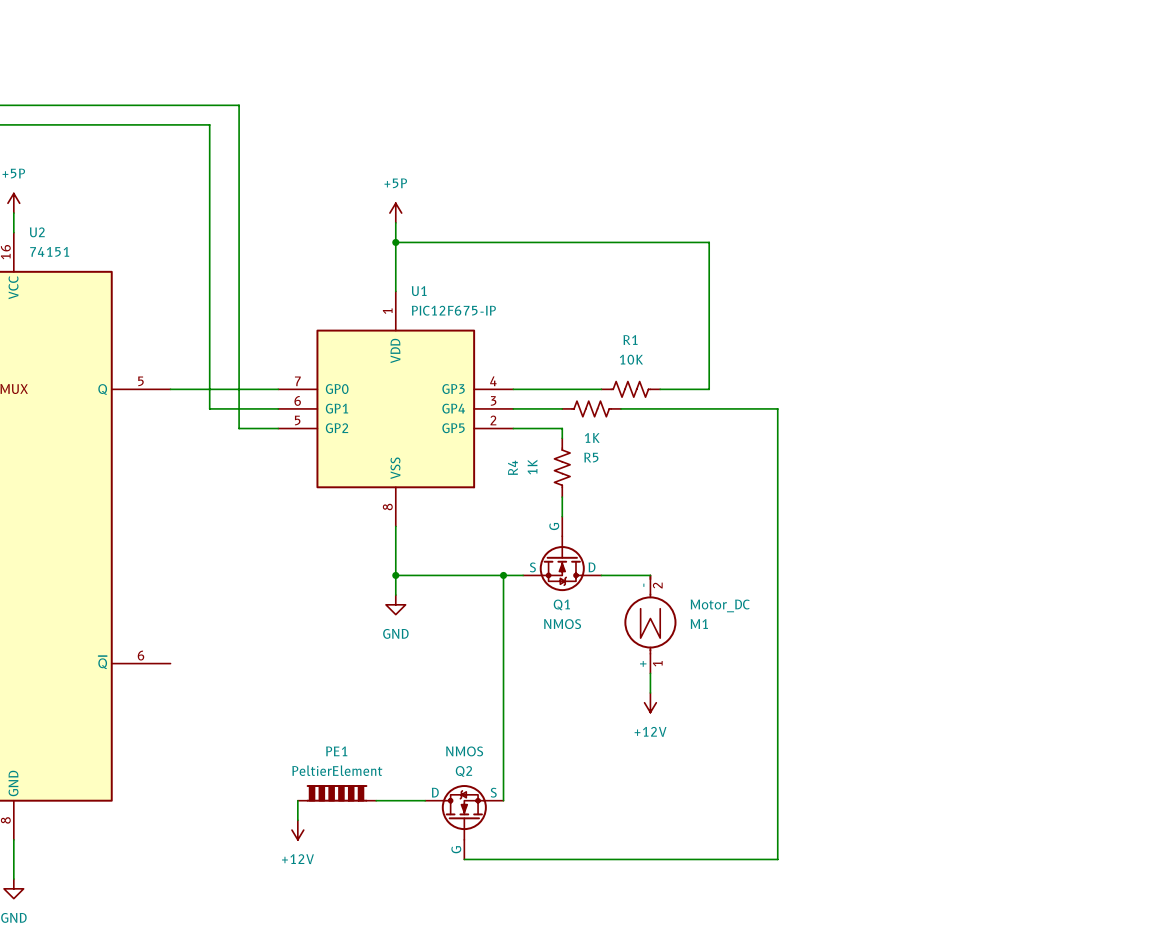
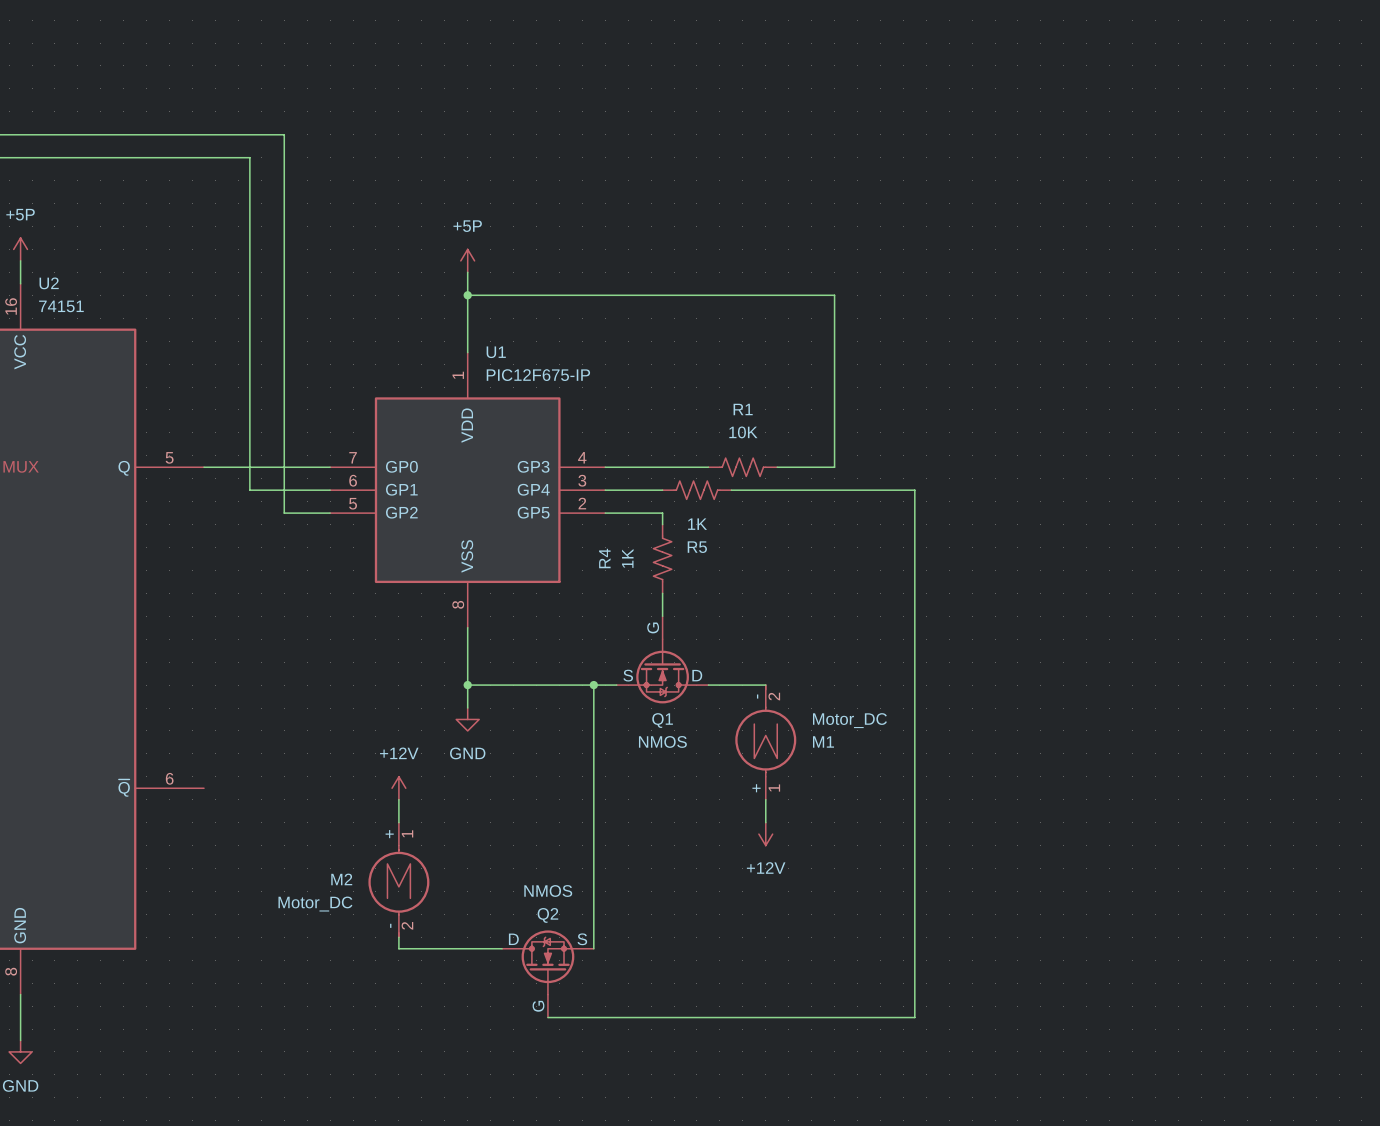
M2: none -> Motor_DC (398, 879)
PE1: PeltierElement (337, 793) -> none
wire: (297, 800) (297, 820) -> (398, 799) (398, 822)
power symbol rotation: 0° (297, 830) -> 180° (398, 788)
power symbol position: +12V (297, 830) -> +12V (398, 788)

